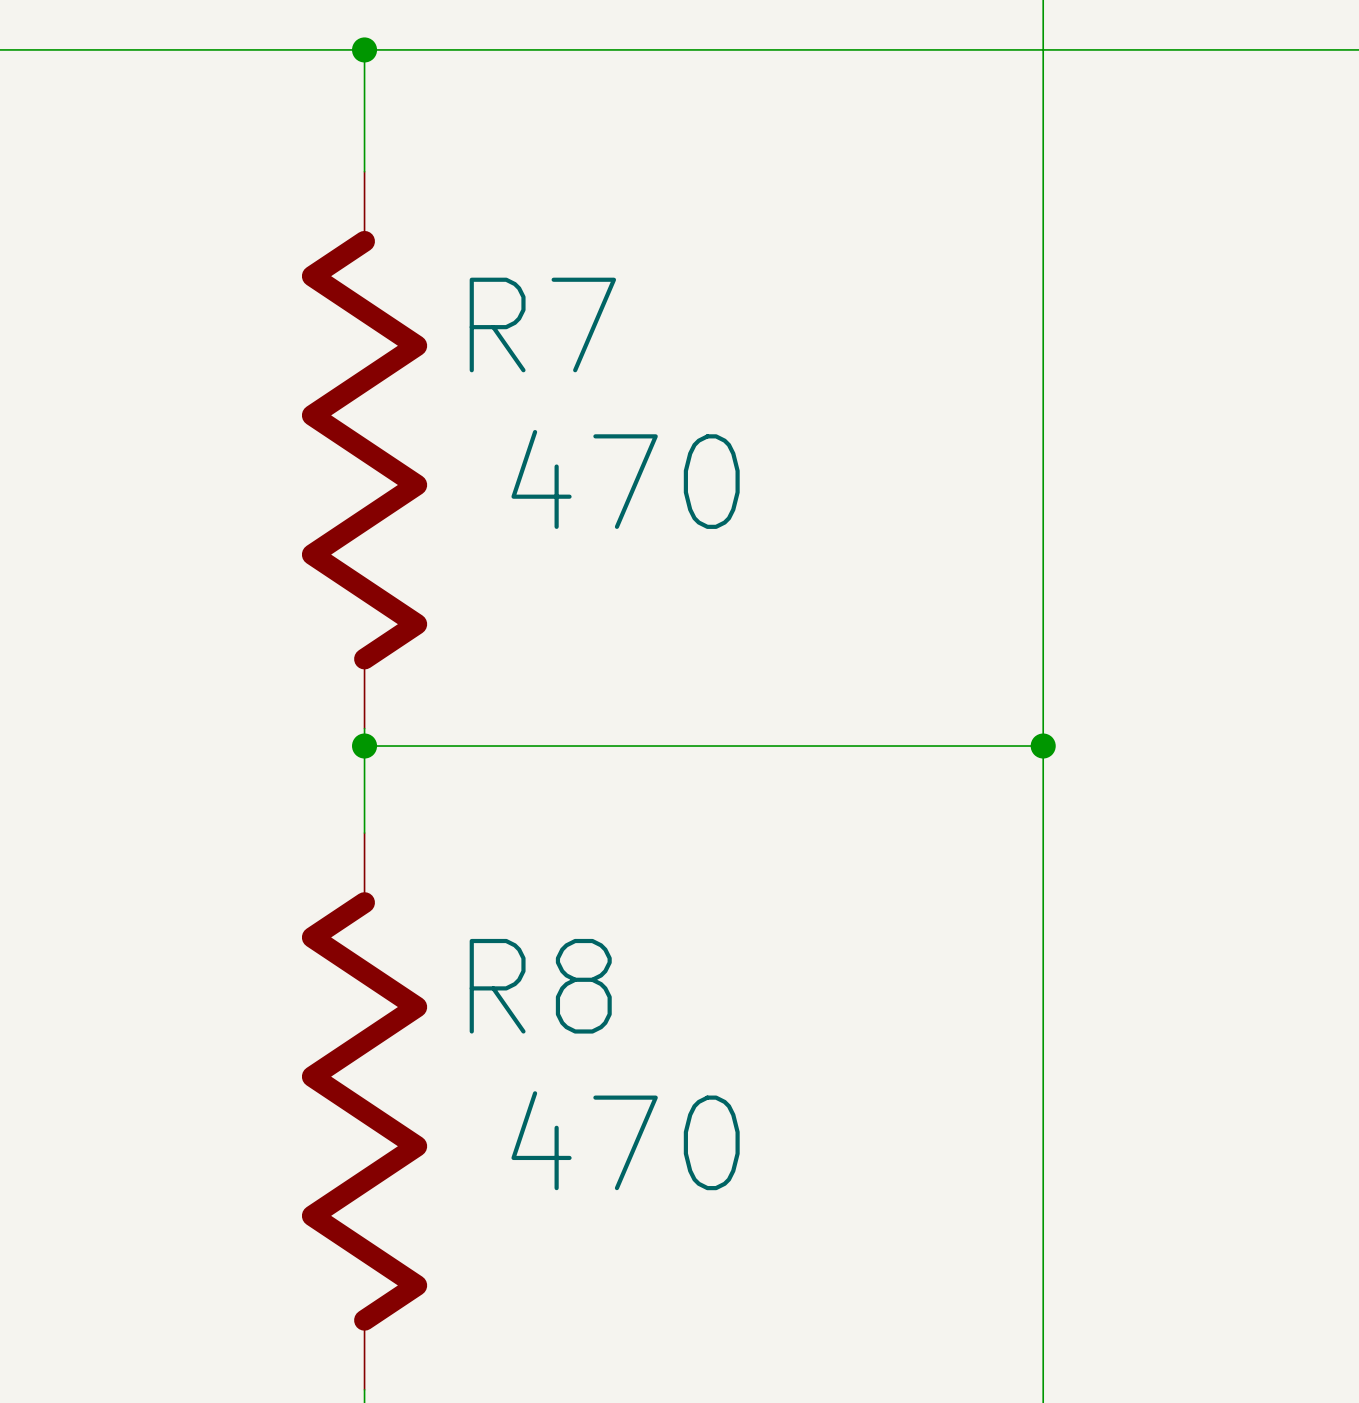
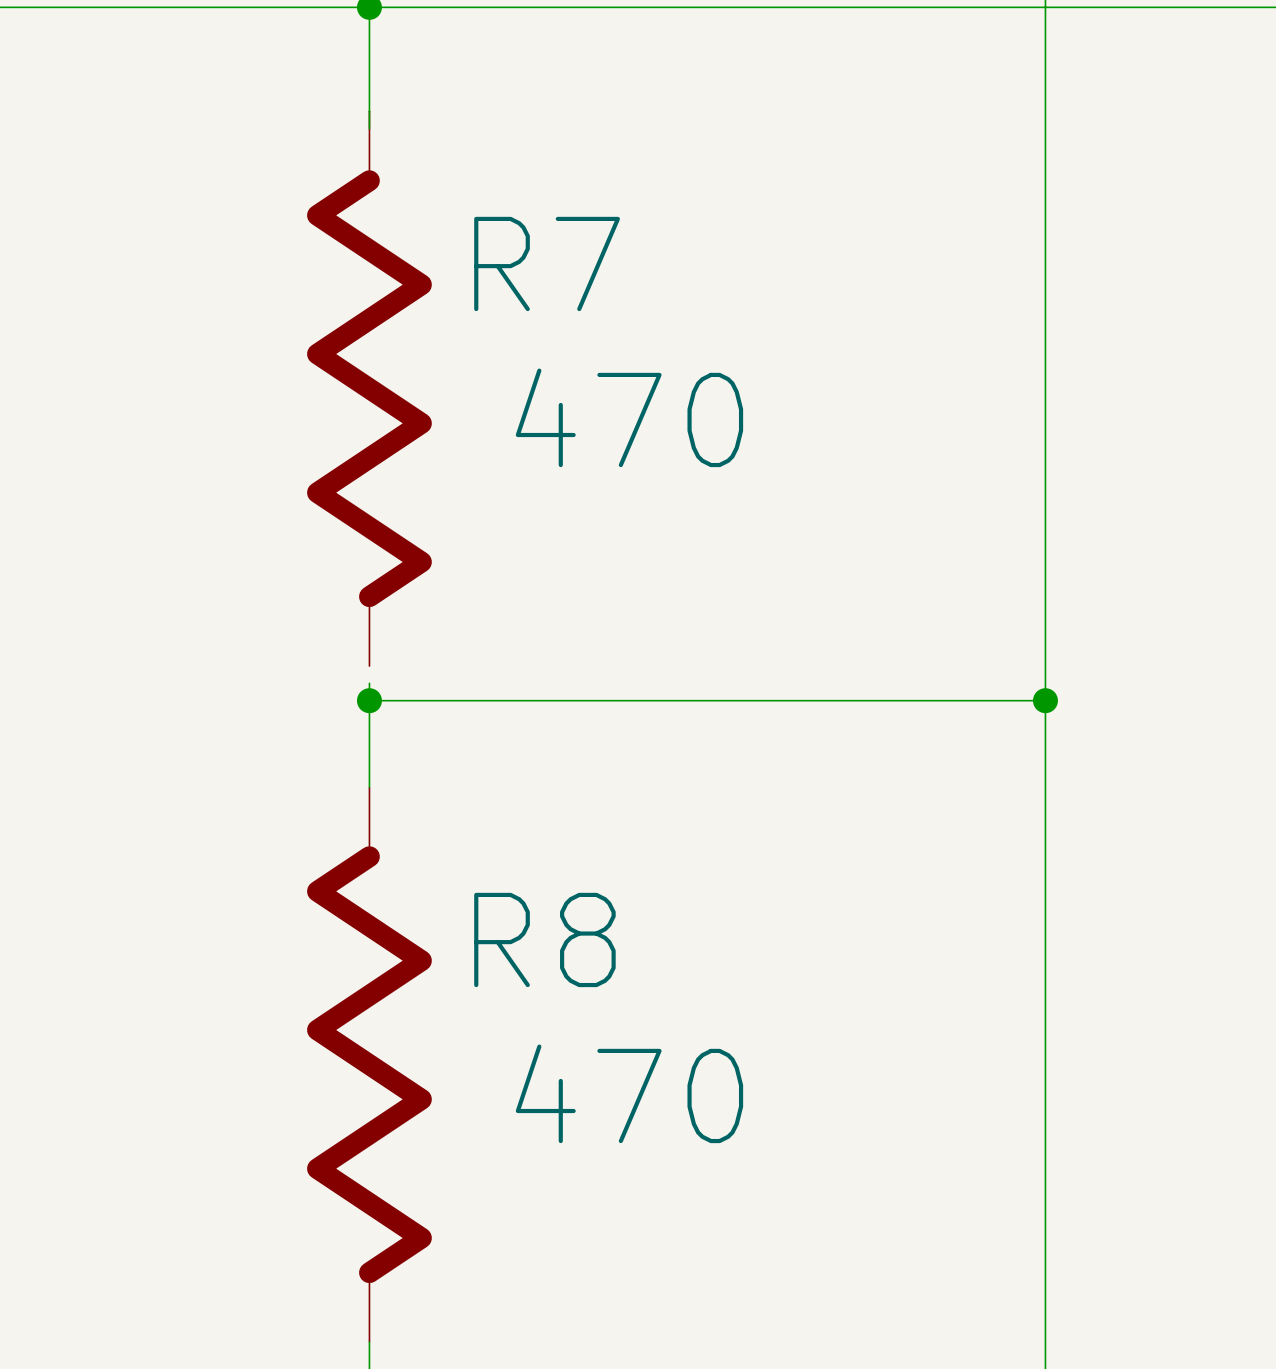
part position: (364, 450) -> (369, 388)

